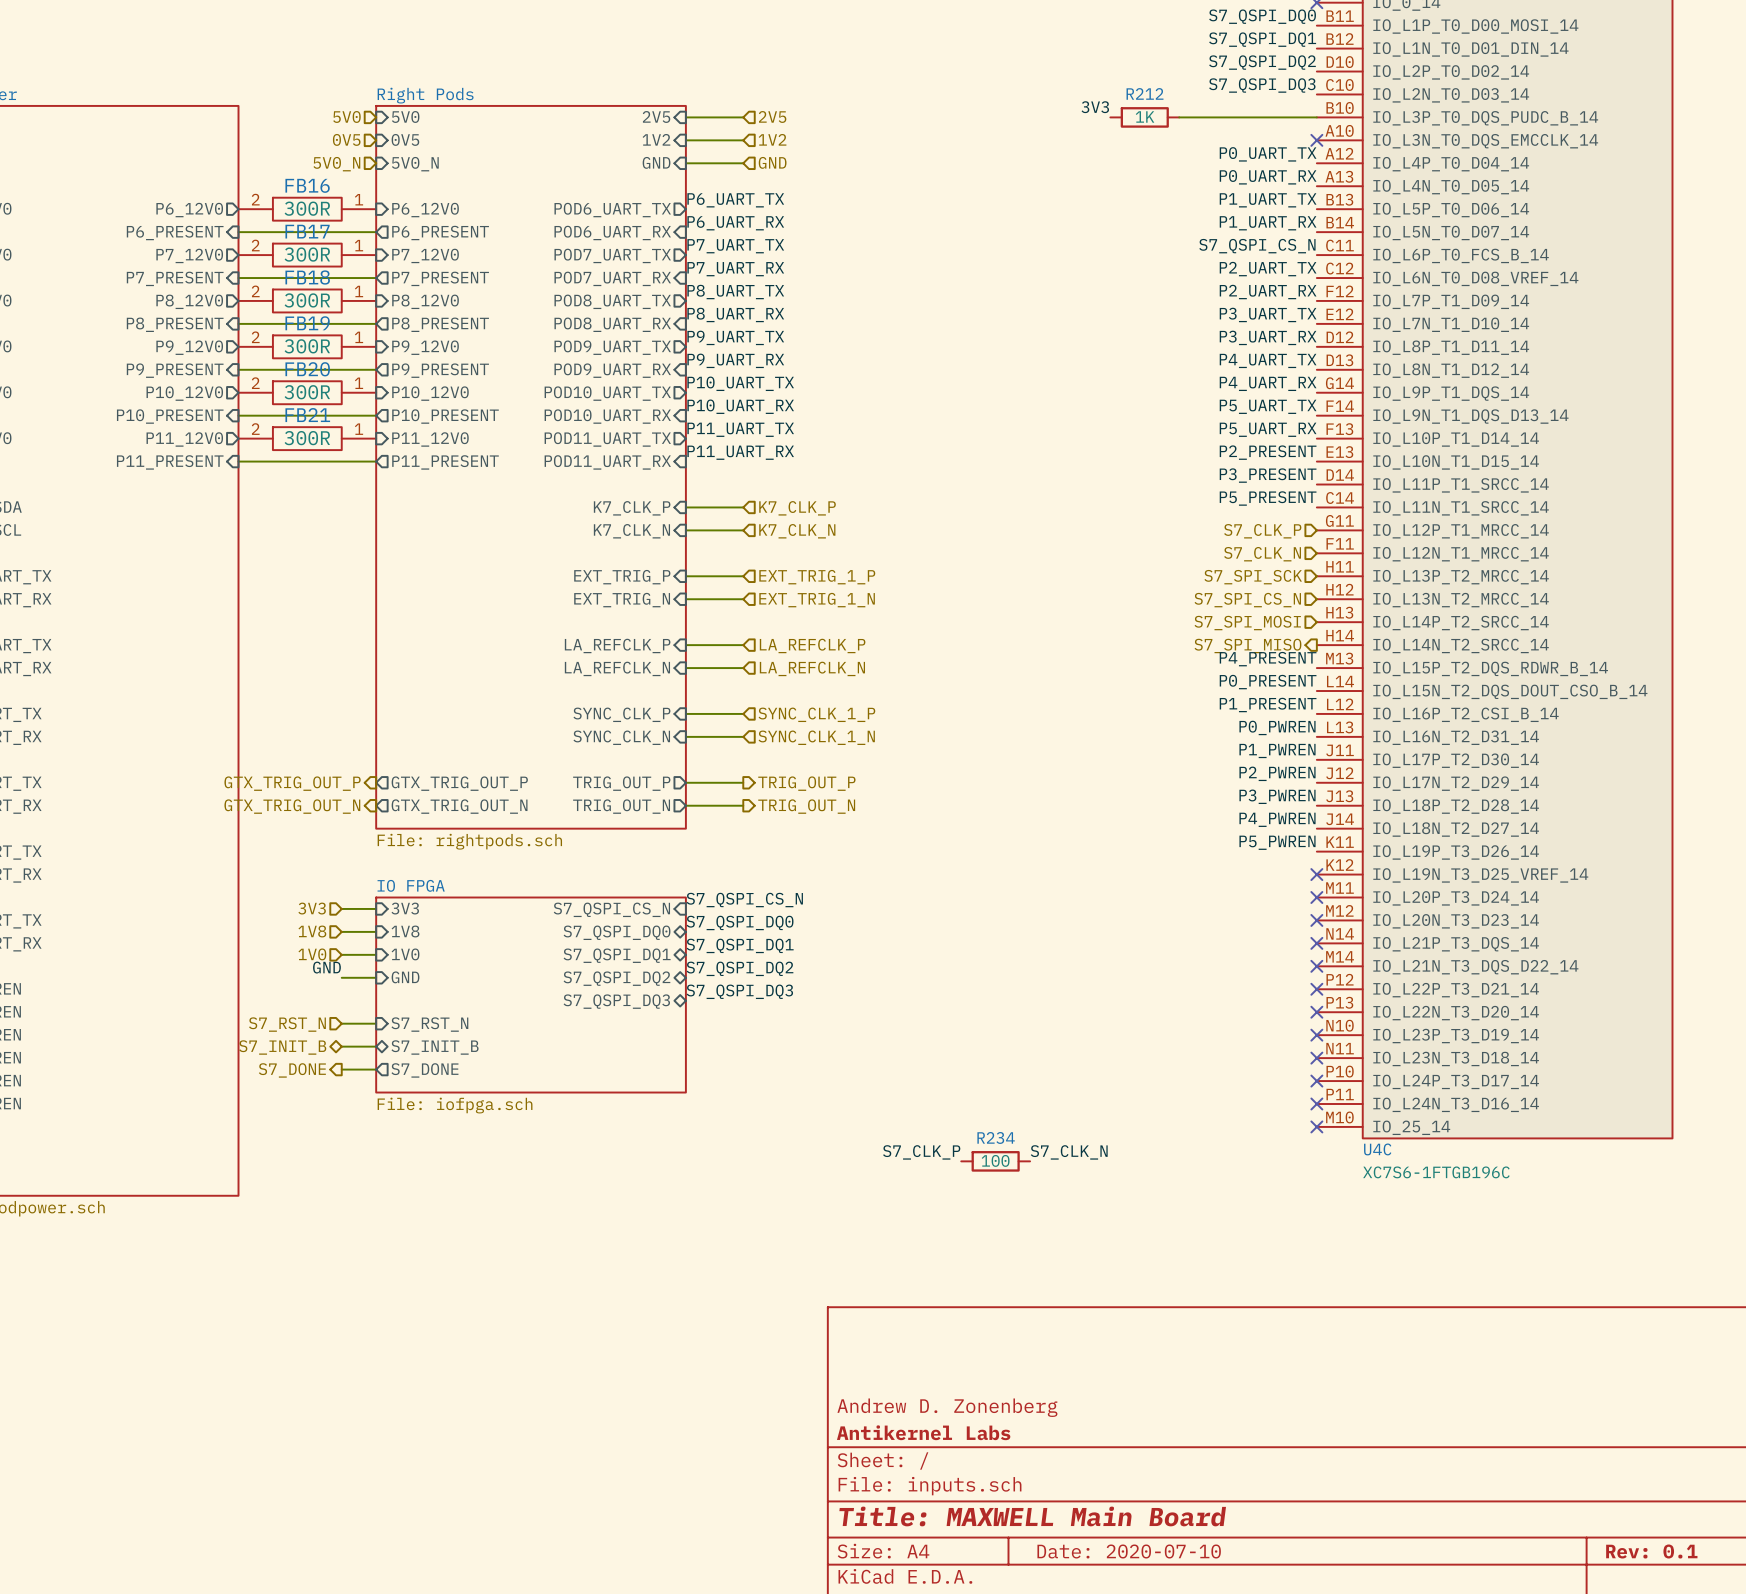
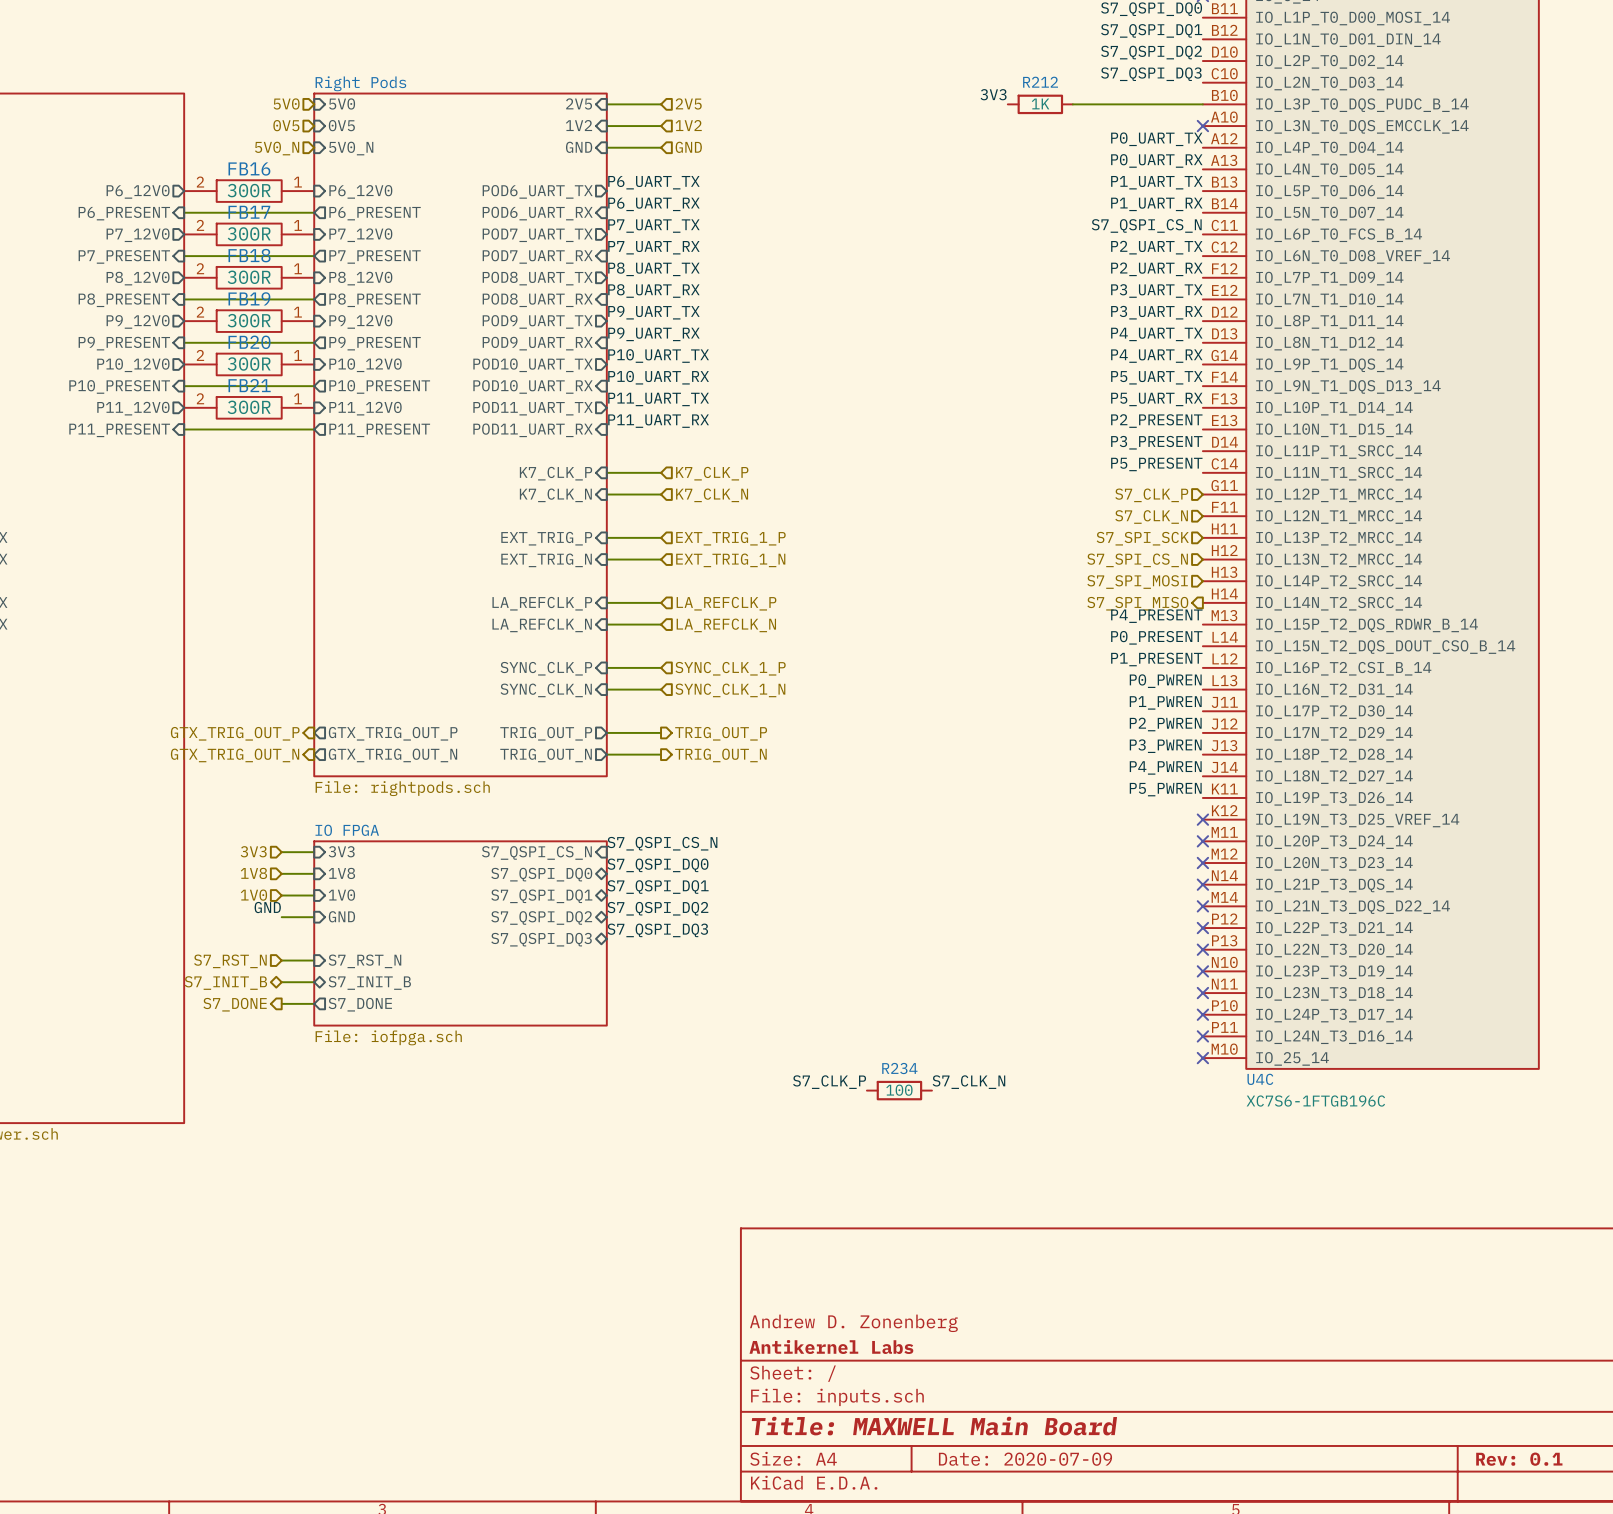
title block: Date: 2020-07-10 (1129, 1551) -> Date: 2020-07-09 (1025, 1459)

